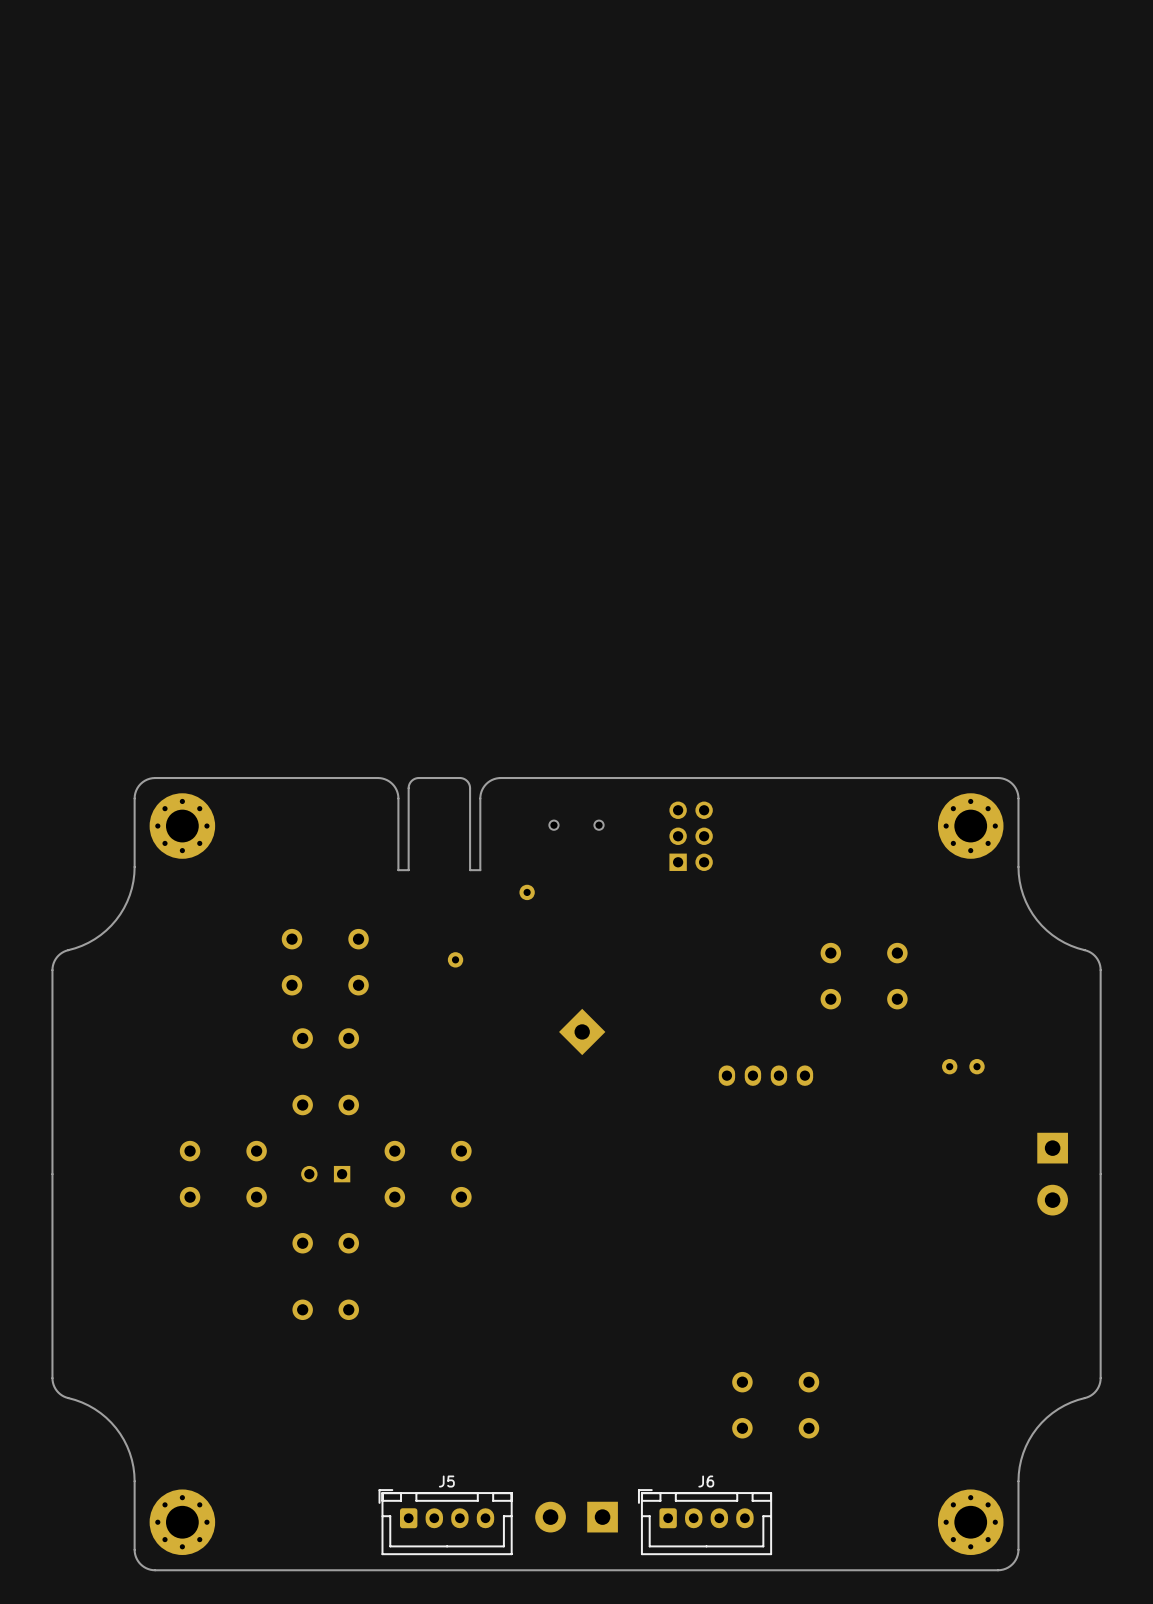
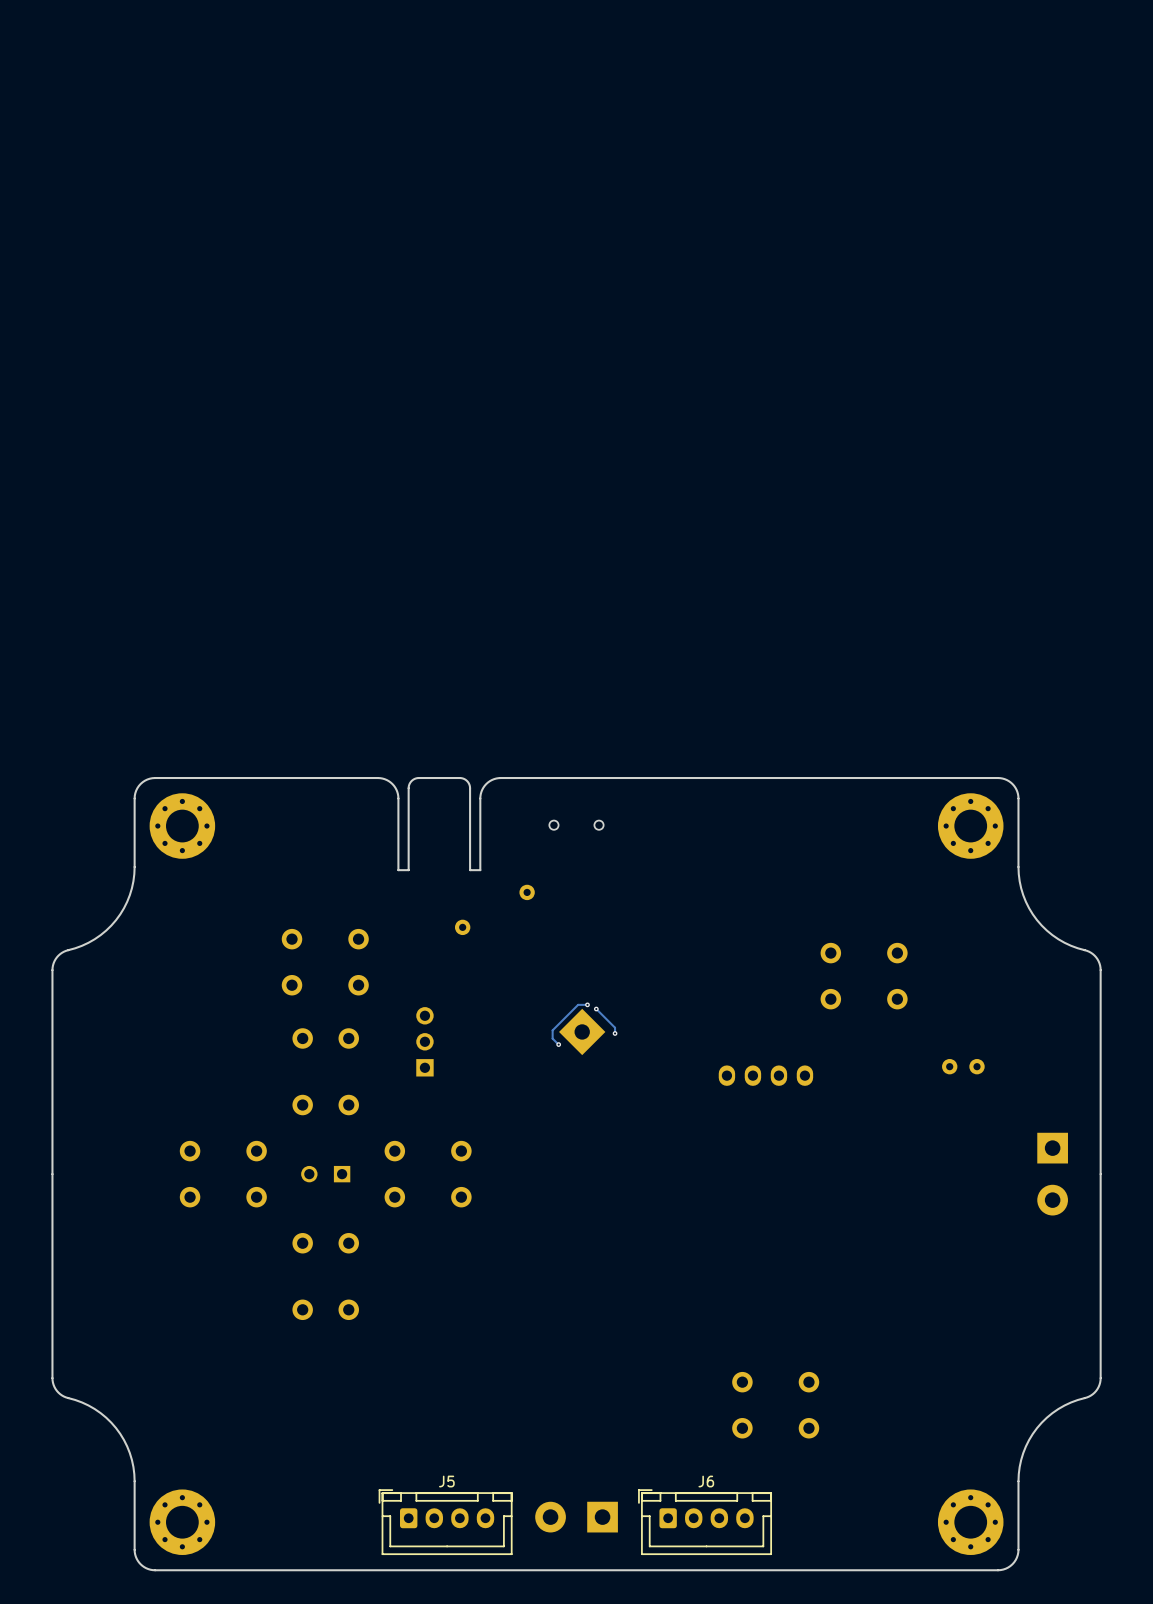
part: (691, 836) -> none
part position: (455, 959) -> (462, 927)
track: none -> (587, 1004) (578, 1004) (552, 1030) (552, 1038) (558, 1044)
via: none -> (587, 1004)
track: none -> (596, 1009) (615, 1027) (615, 1033)
via: none -> (596, 1009)
via: none -> (615, 1033)
part: none -> (424, 1041)
via: none -> (558, 1044)

